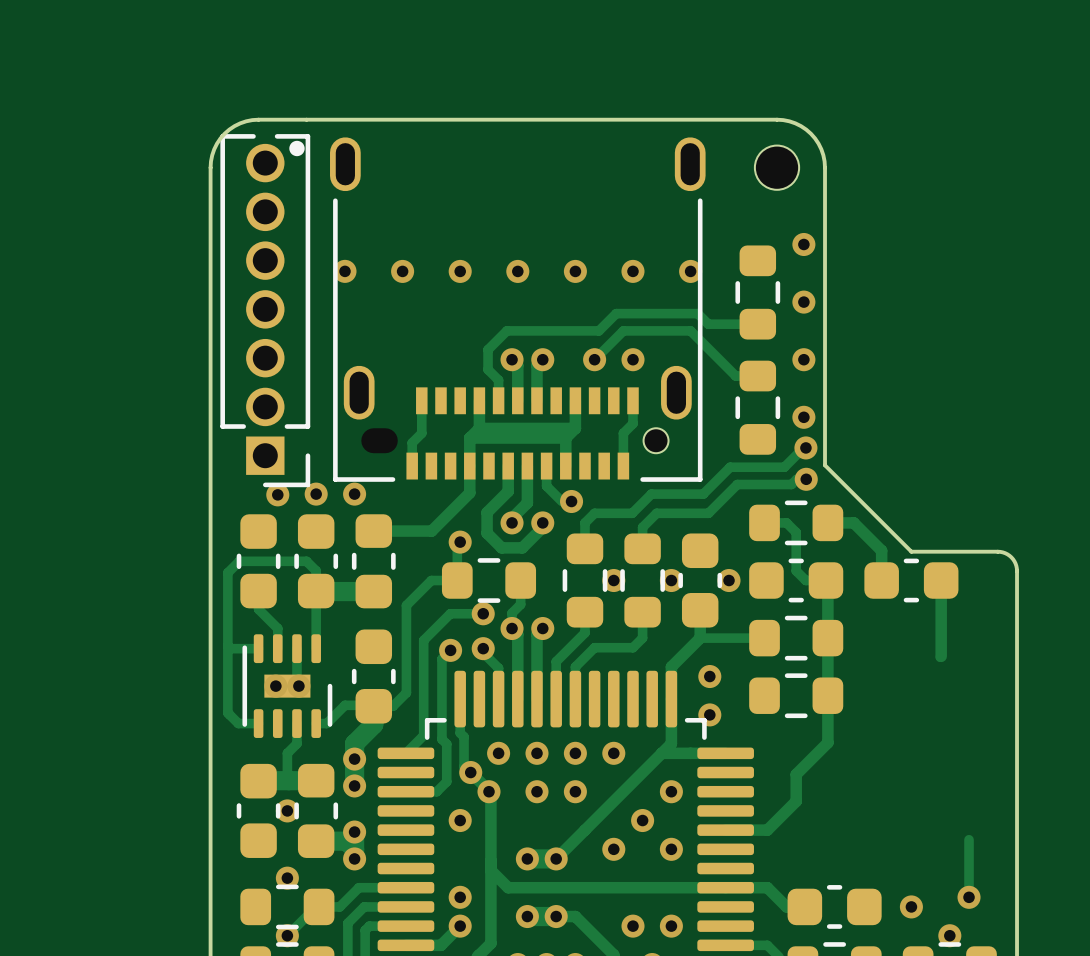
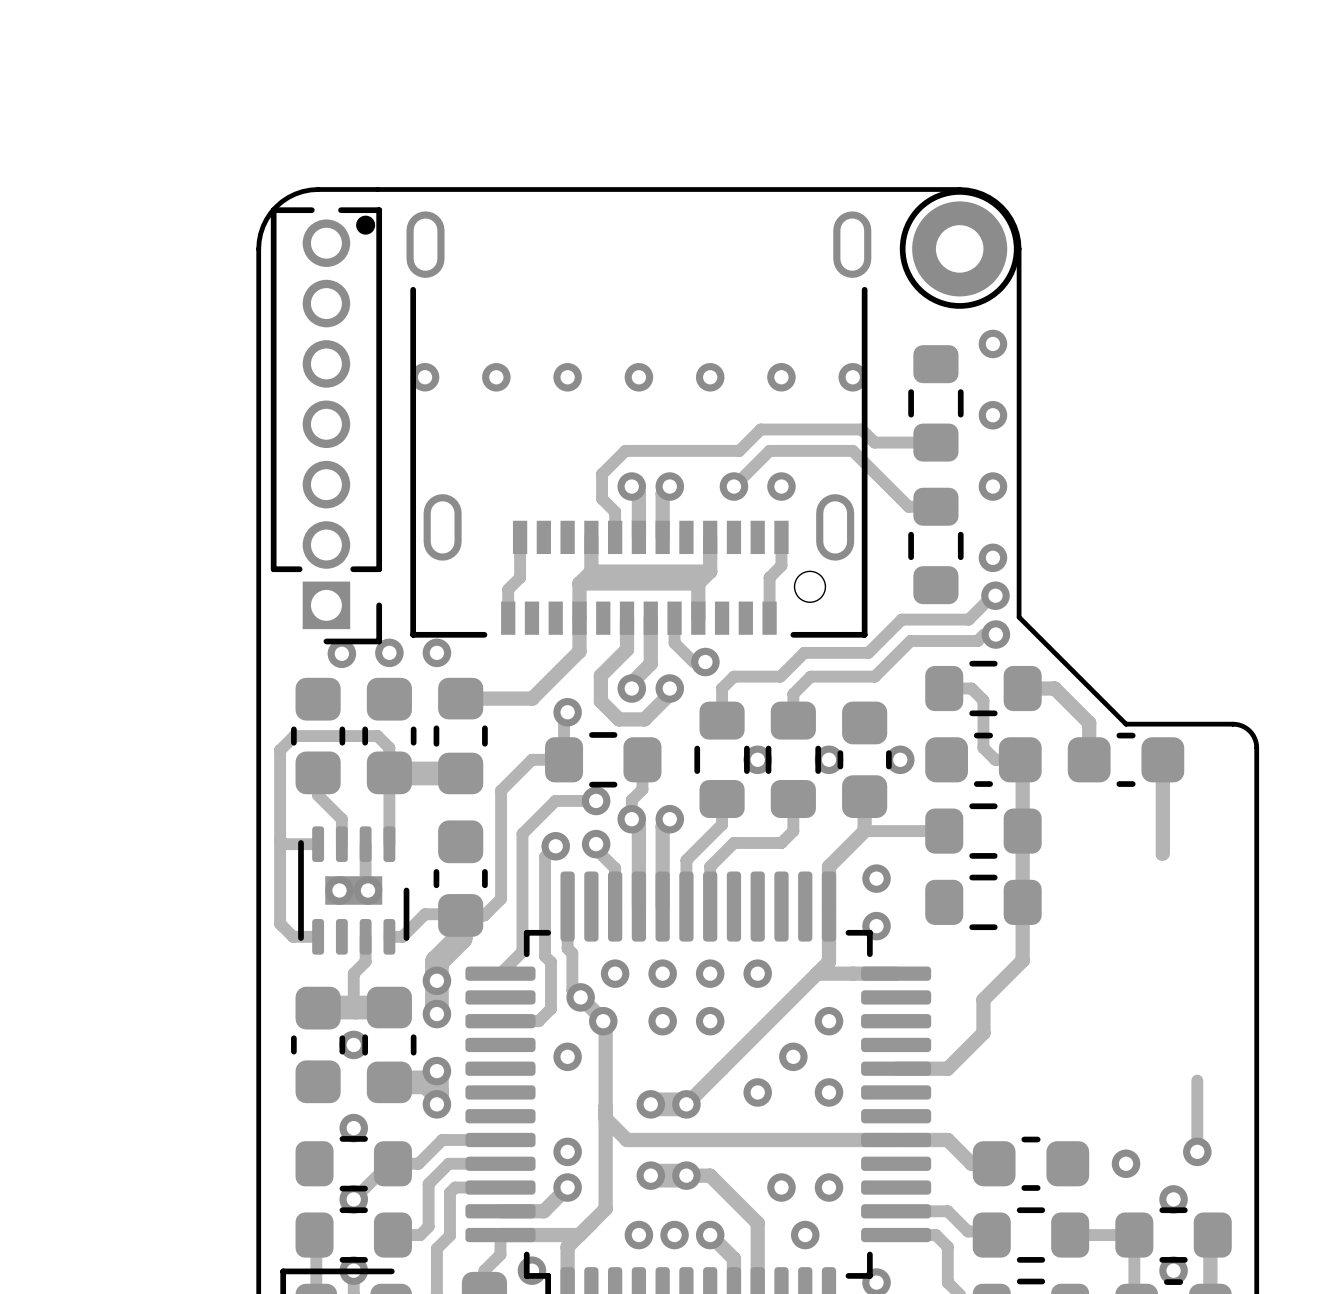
part footprint: [754, 145, 800, 190] -> [899, 189, 1020, 309]

